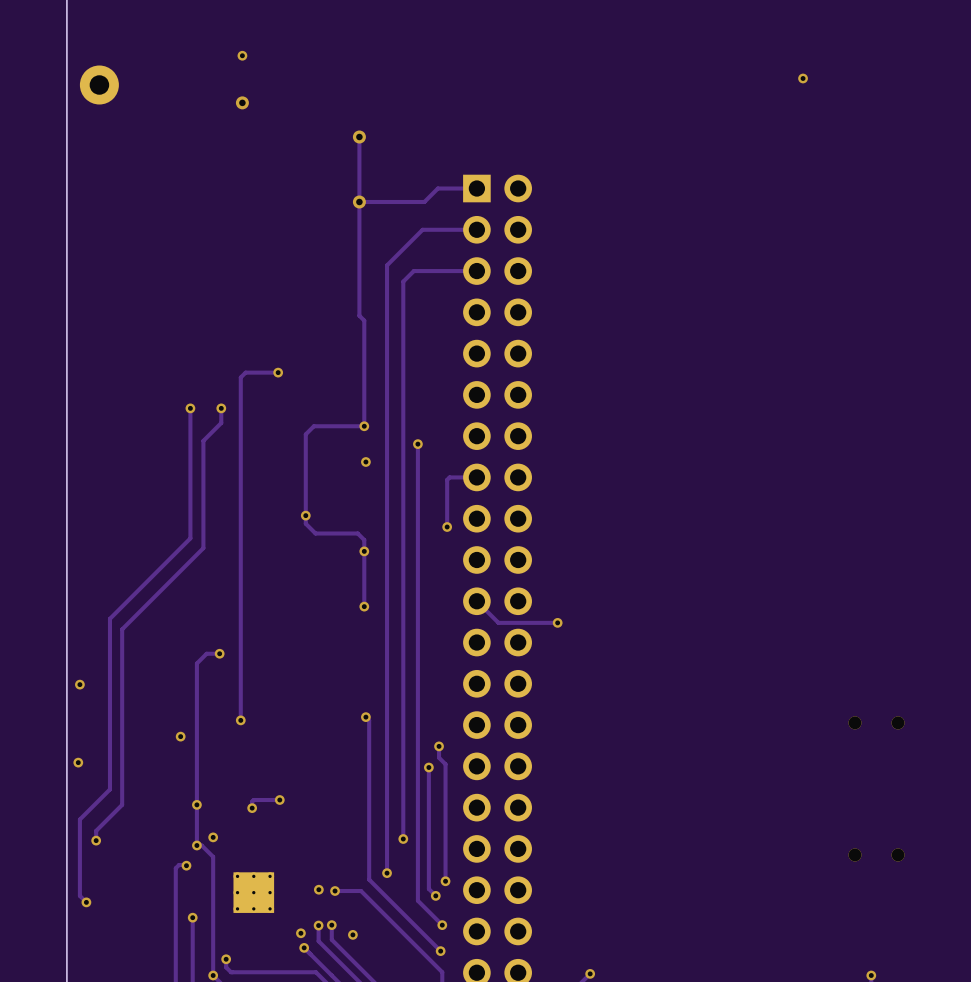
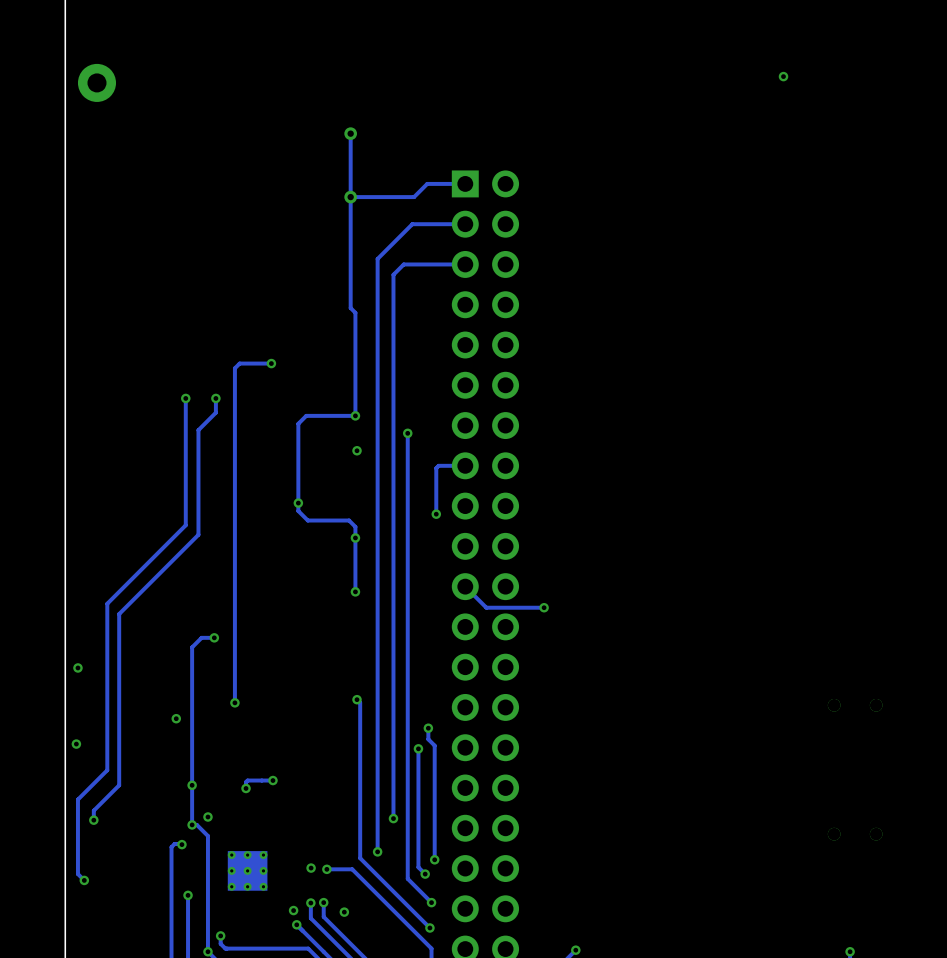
via: (242, 55) -> none
via: (242, 102) -> none

